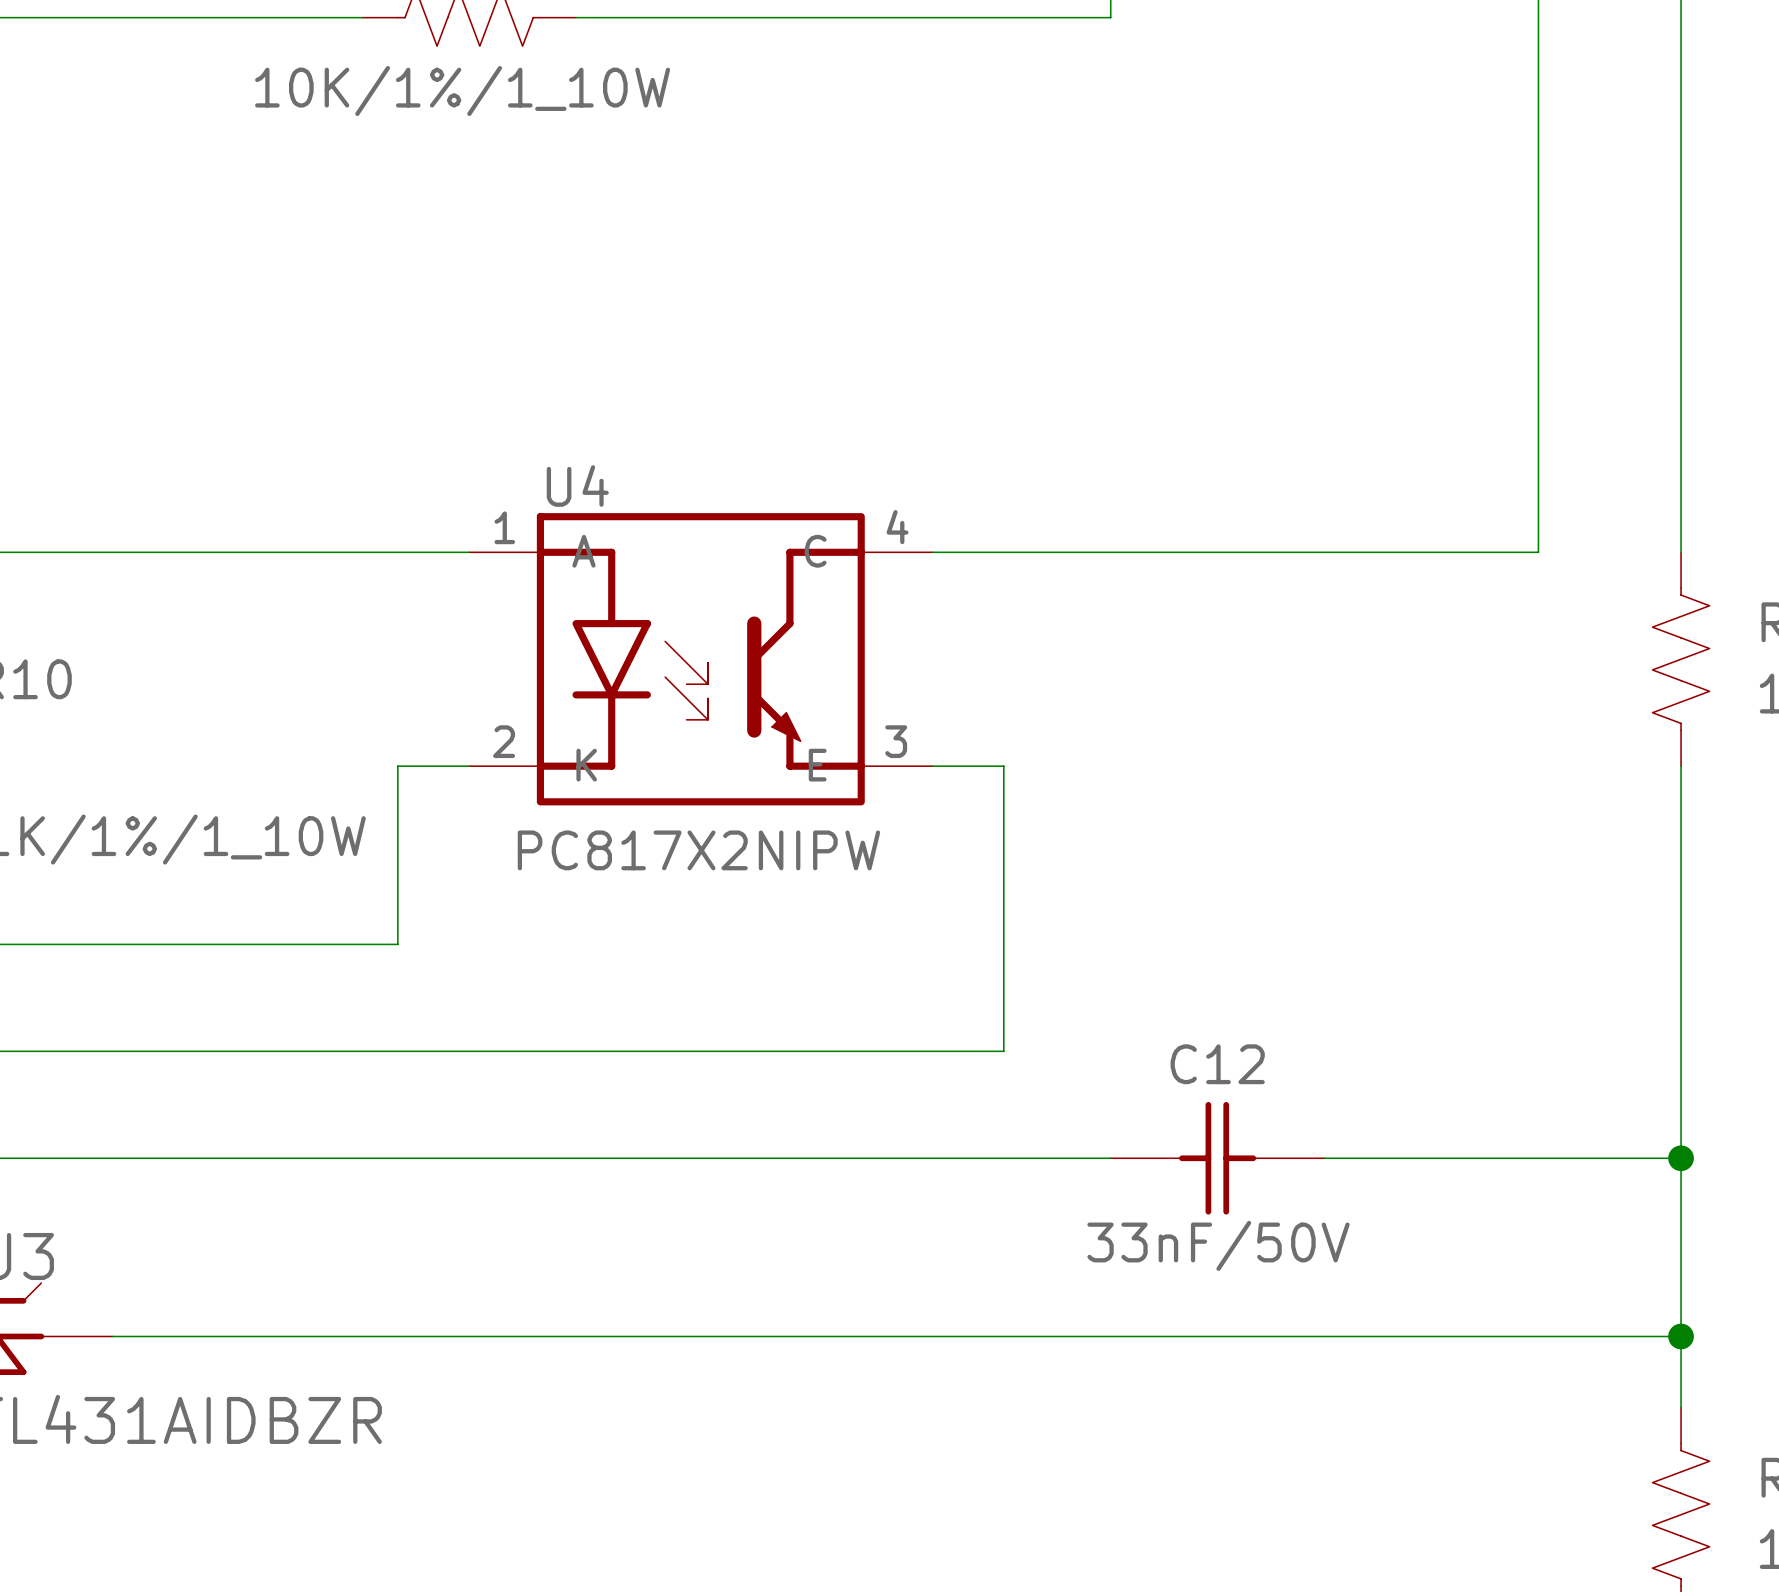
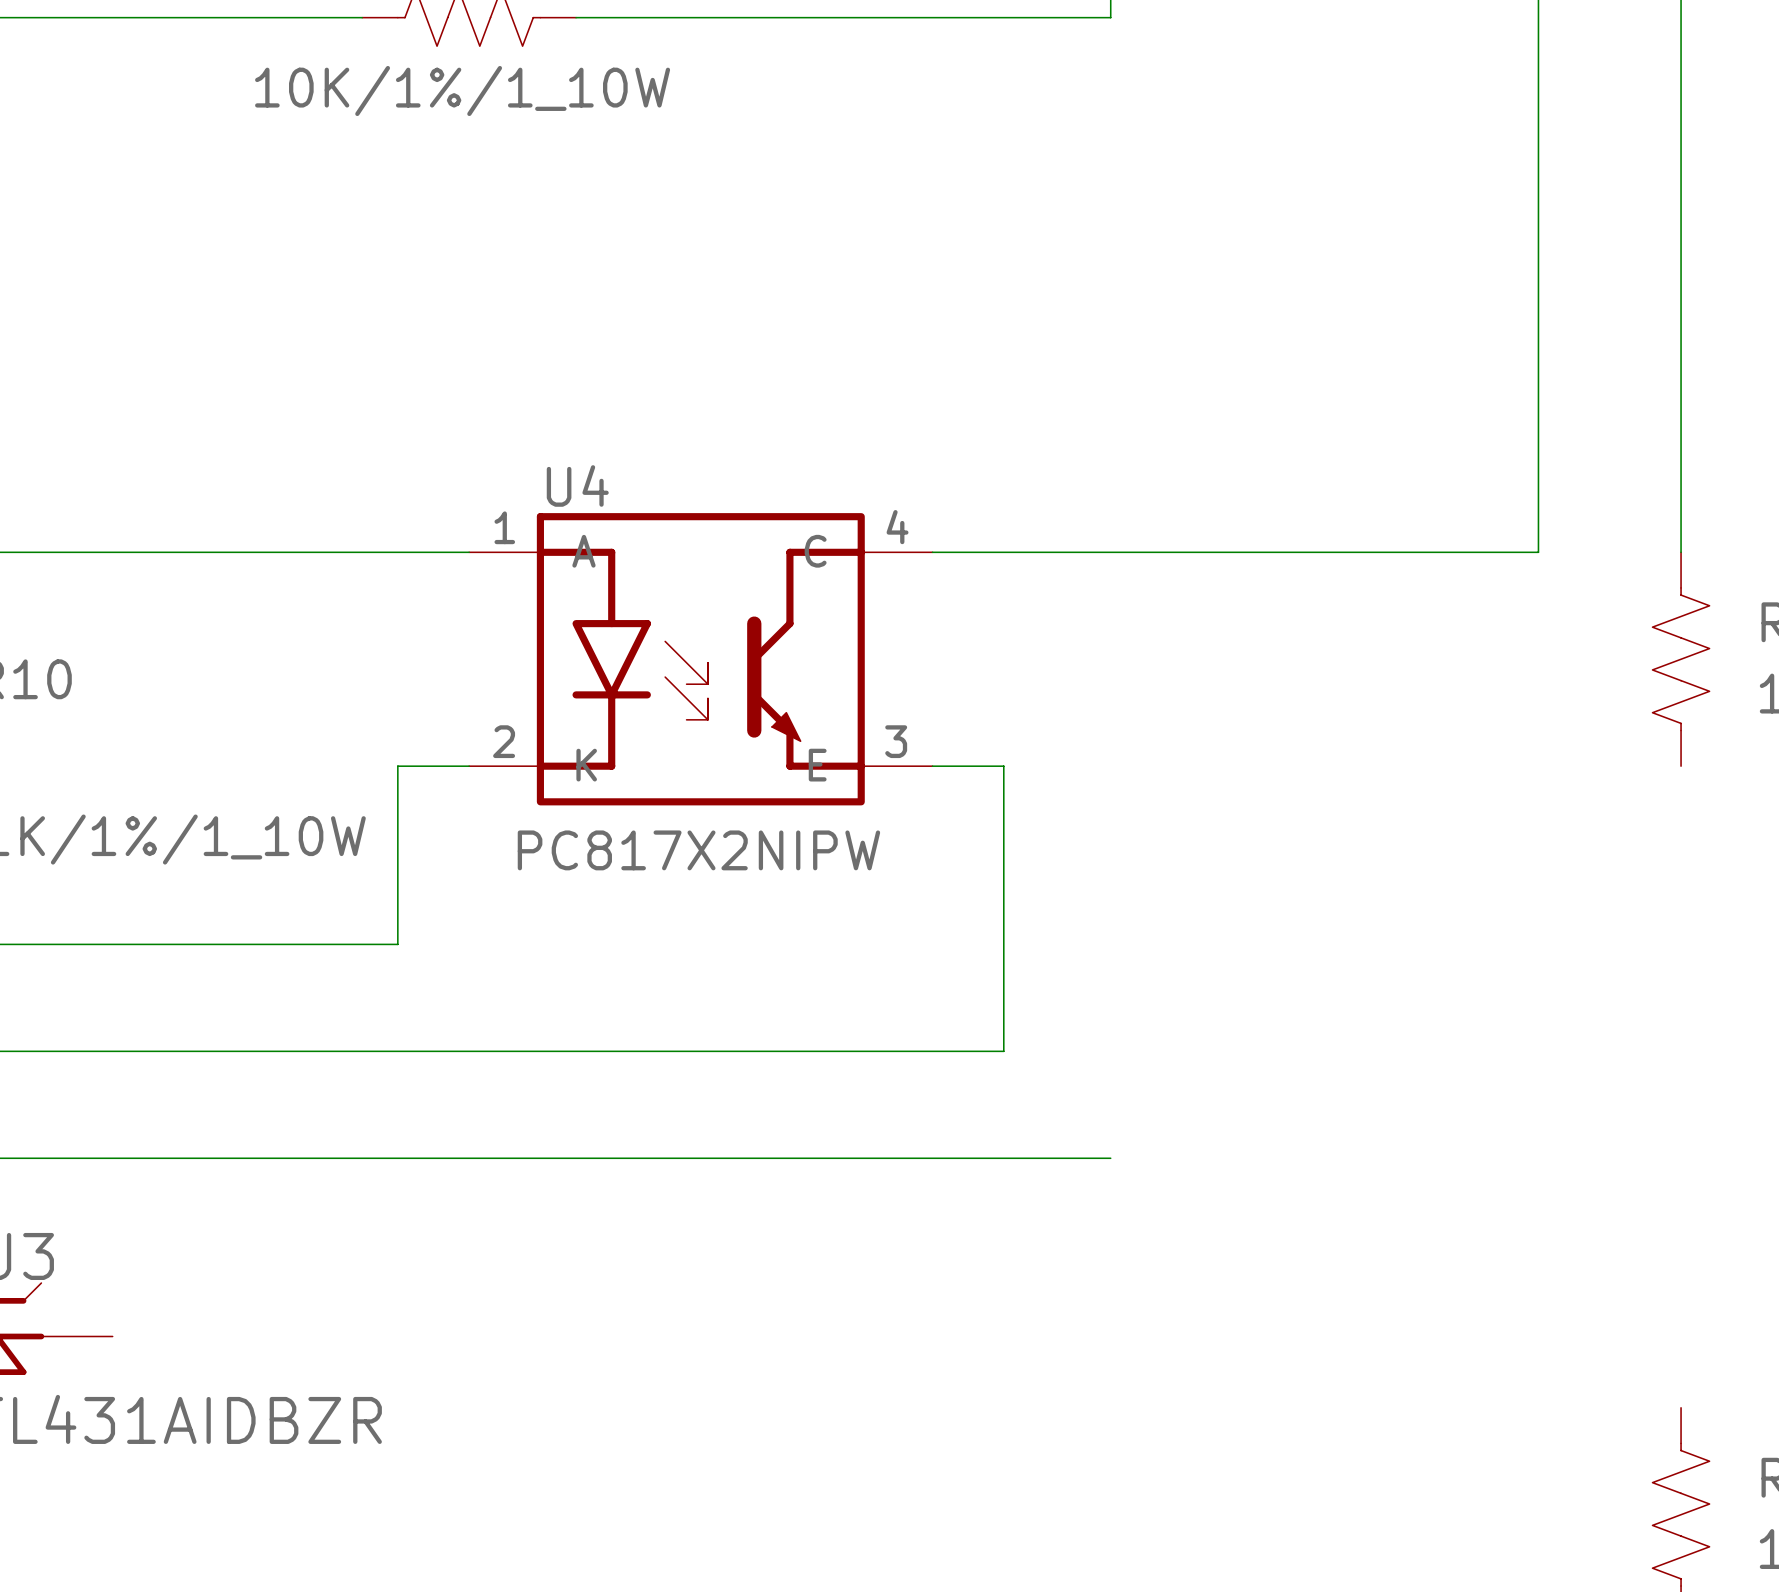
wire: (1681, 766) (1681, 1407) -> none
C12: 33nF/50V (1217, 1158) -> none
wire: (1324, 1158) (1681, 1158) -> none
junction: (1681, 1158) -> none
wire: (112, 1336) (1681, 1336) -> none
junction: (1681, 1336) -> none

